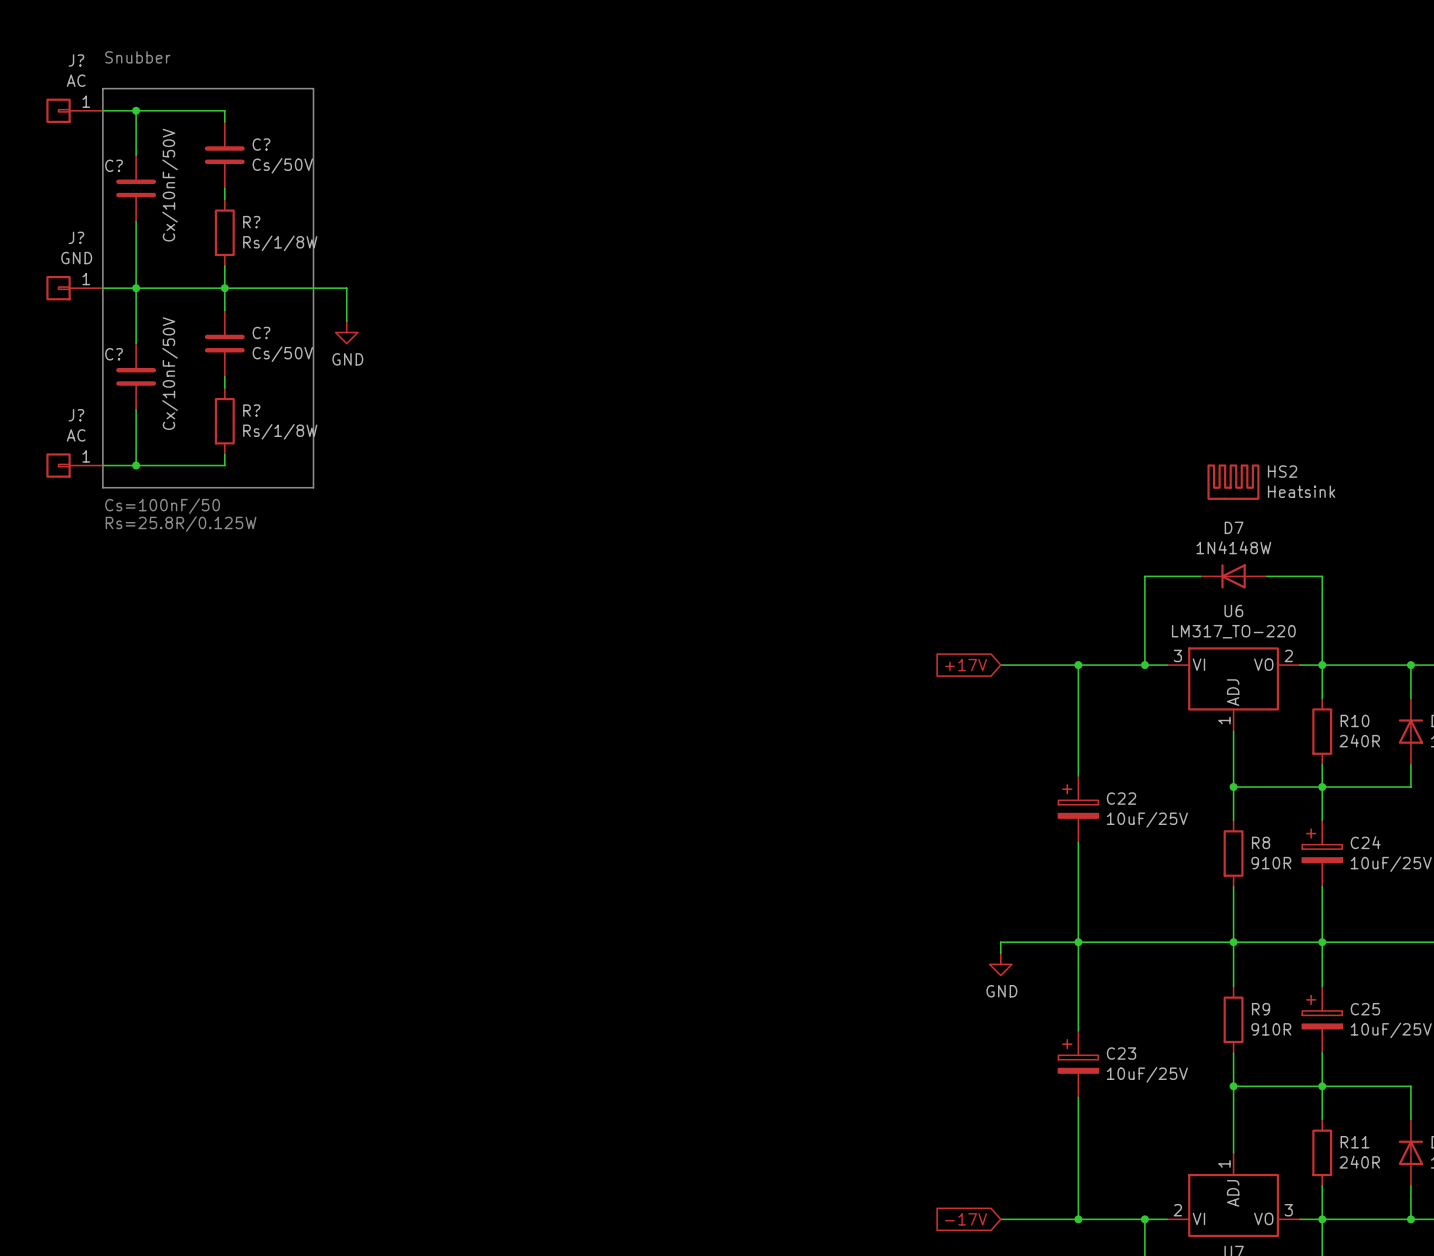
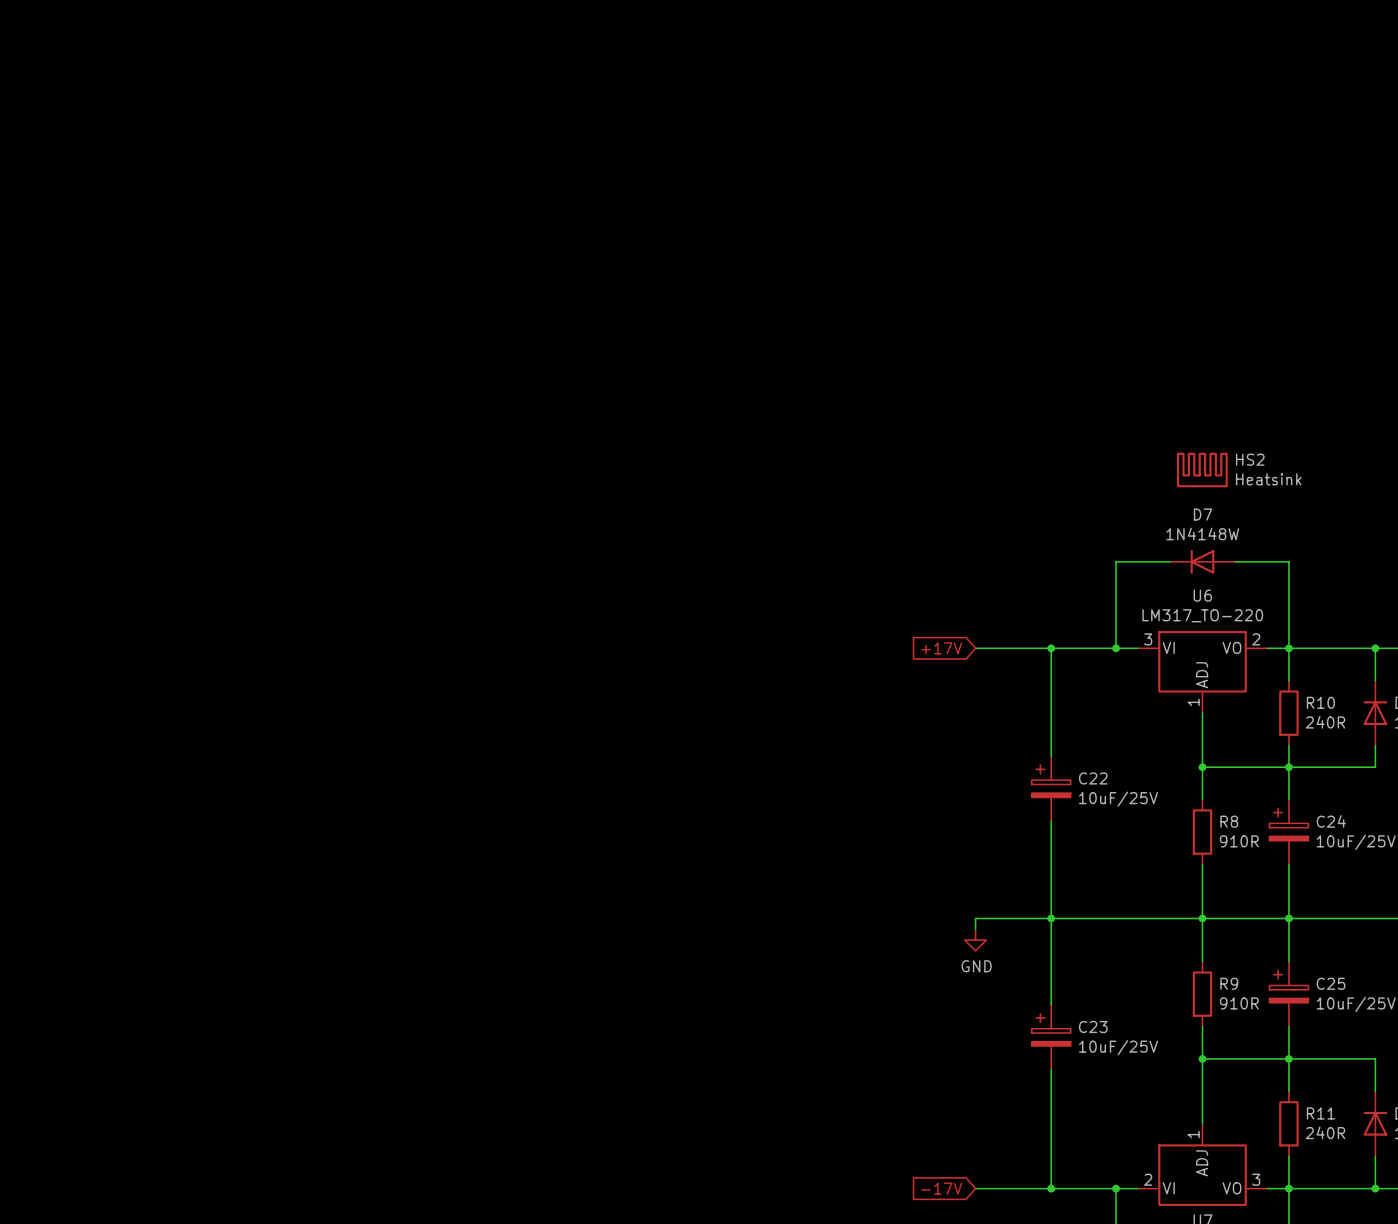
text: Snubber (137, 57) -> none
line: (102, 88) (102, 487) (313, 487) (313, 88) (102, 88) -> none
J?: AC (74, 110) -> none
wire: (102, 110) (224, 110) (224, 121) -> none
wire: (136, 110) (136, 155) -> none
junction: (136, 110) -> none
C?: Cs/50V (224, 155) -> none
C?: Cx/10nF/50V (136, 188) -> none
wire: (224, 188) (224, 199) -> none
wire: (136, 221) (136, 343) -> none
R?: Rs/1/8W (224, 232) -> none
wire: (224, 266) (224, 310) -> none
J?: GND (74, 288) -> none
wire: (102, 288) (346, 288) (346, 321) -> none
junction: (136, 288) -> none
junction: (224, 288) -> none
power symbol: GND (346, 332) -> none
C?: Cs/50V (224, 343) -> none
C?: Cx/10nF/50V (136, 376) -> none
wire: (224, 376) (224, 387) -> none
wire: (136, 410) (136, 465) -> none
R?: Rs/1/8W (224, 421) -> none
wire: (224, 454) (224, 465) (102, 465) -> none
J?: AC (74, 465) -> none
junction: (136, 465) -> none
text: Cs=100nF/50 (162, 506) -> none
text: Rs=25.8R/0.125W (181, 524) -> none

